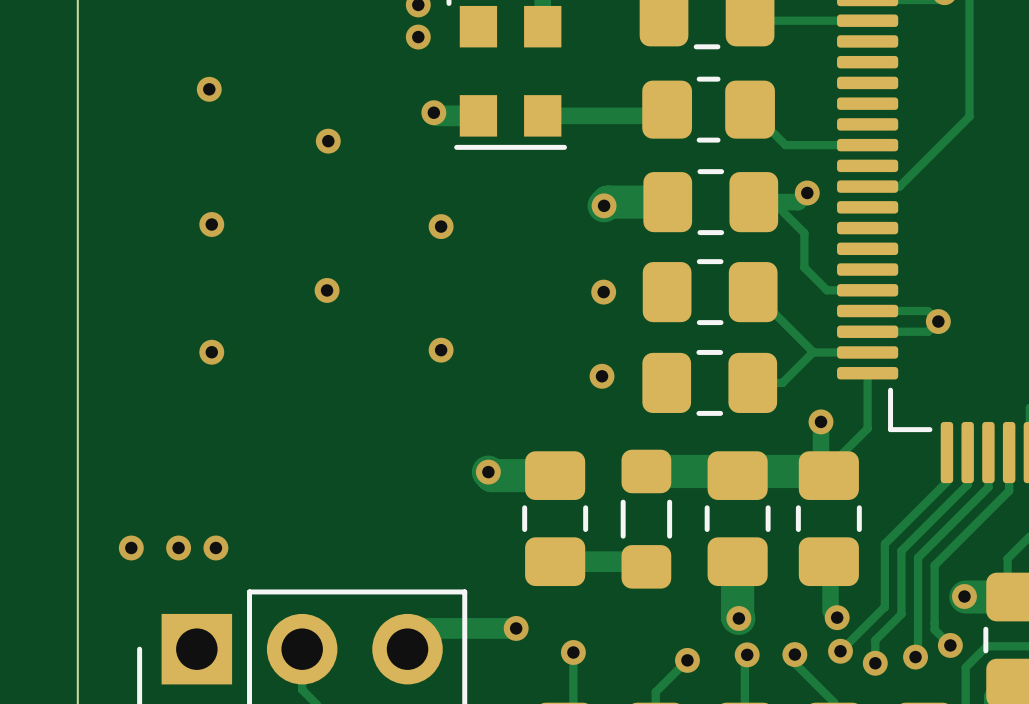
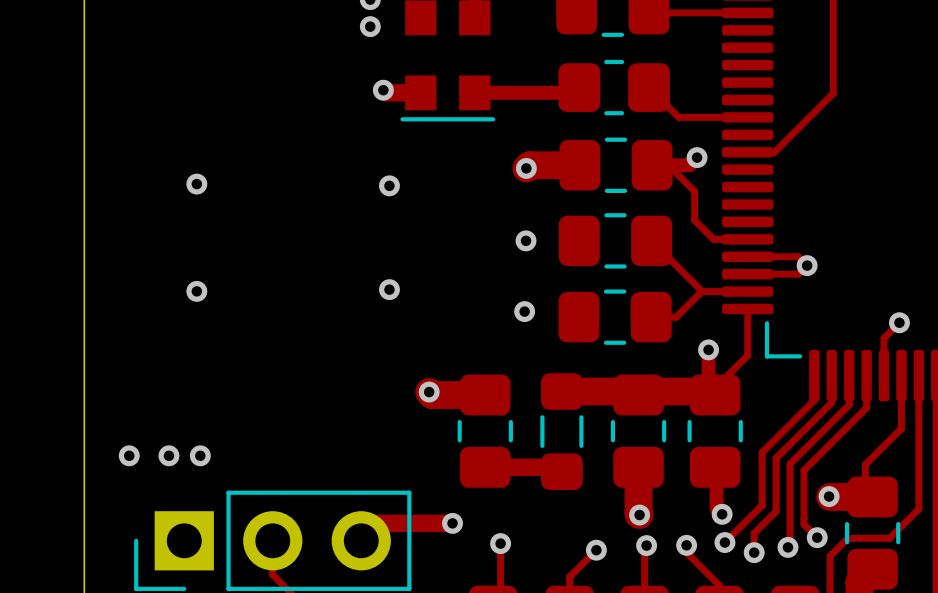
via: (209, 89) -> none
via: (328, 141) -> none
via: (327, 290) -> none

